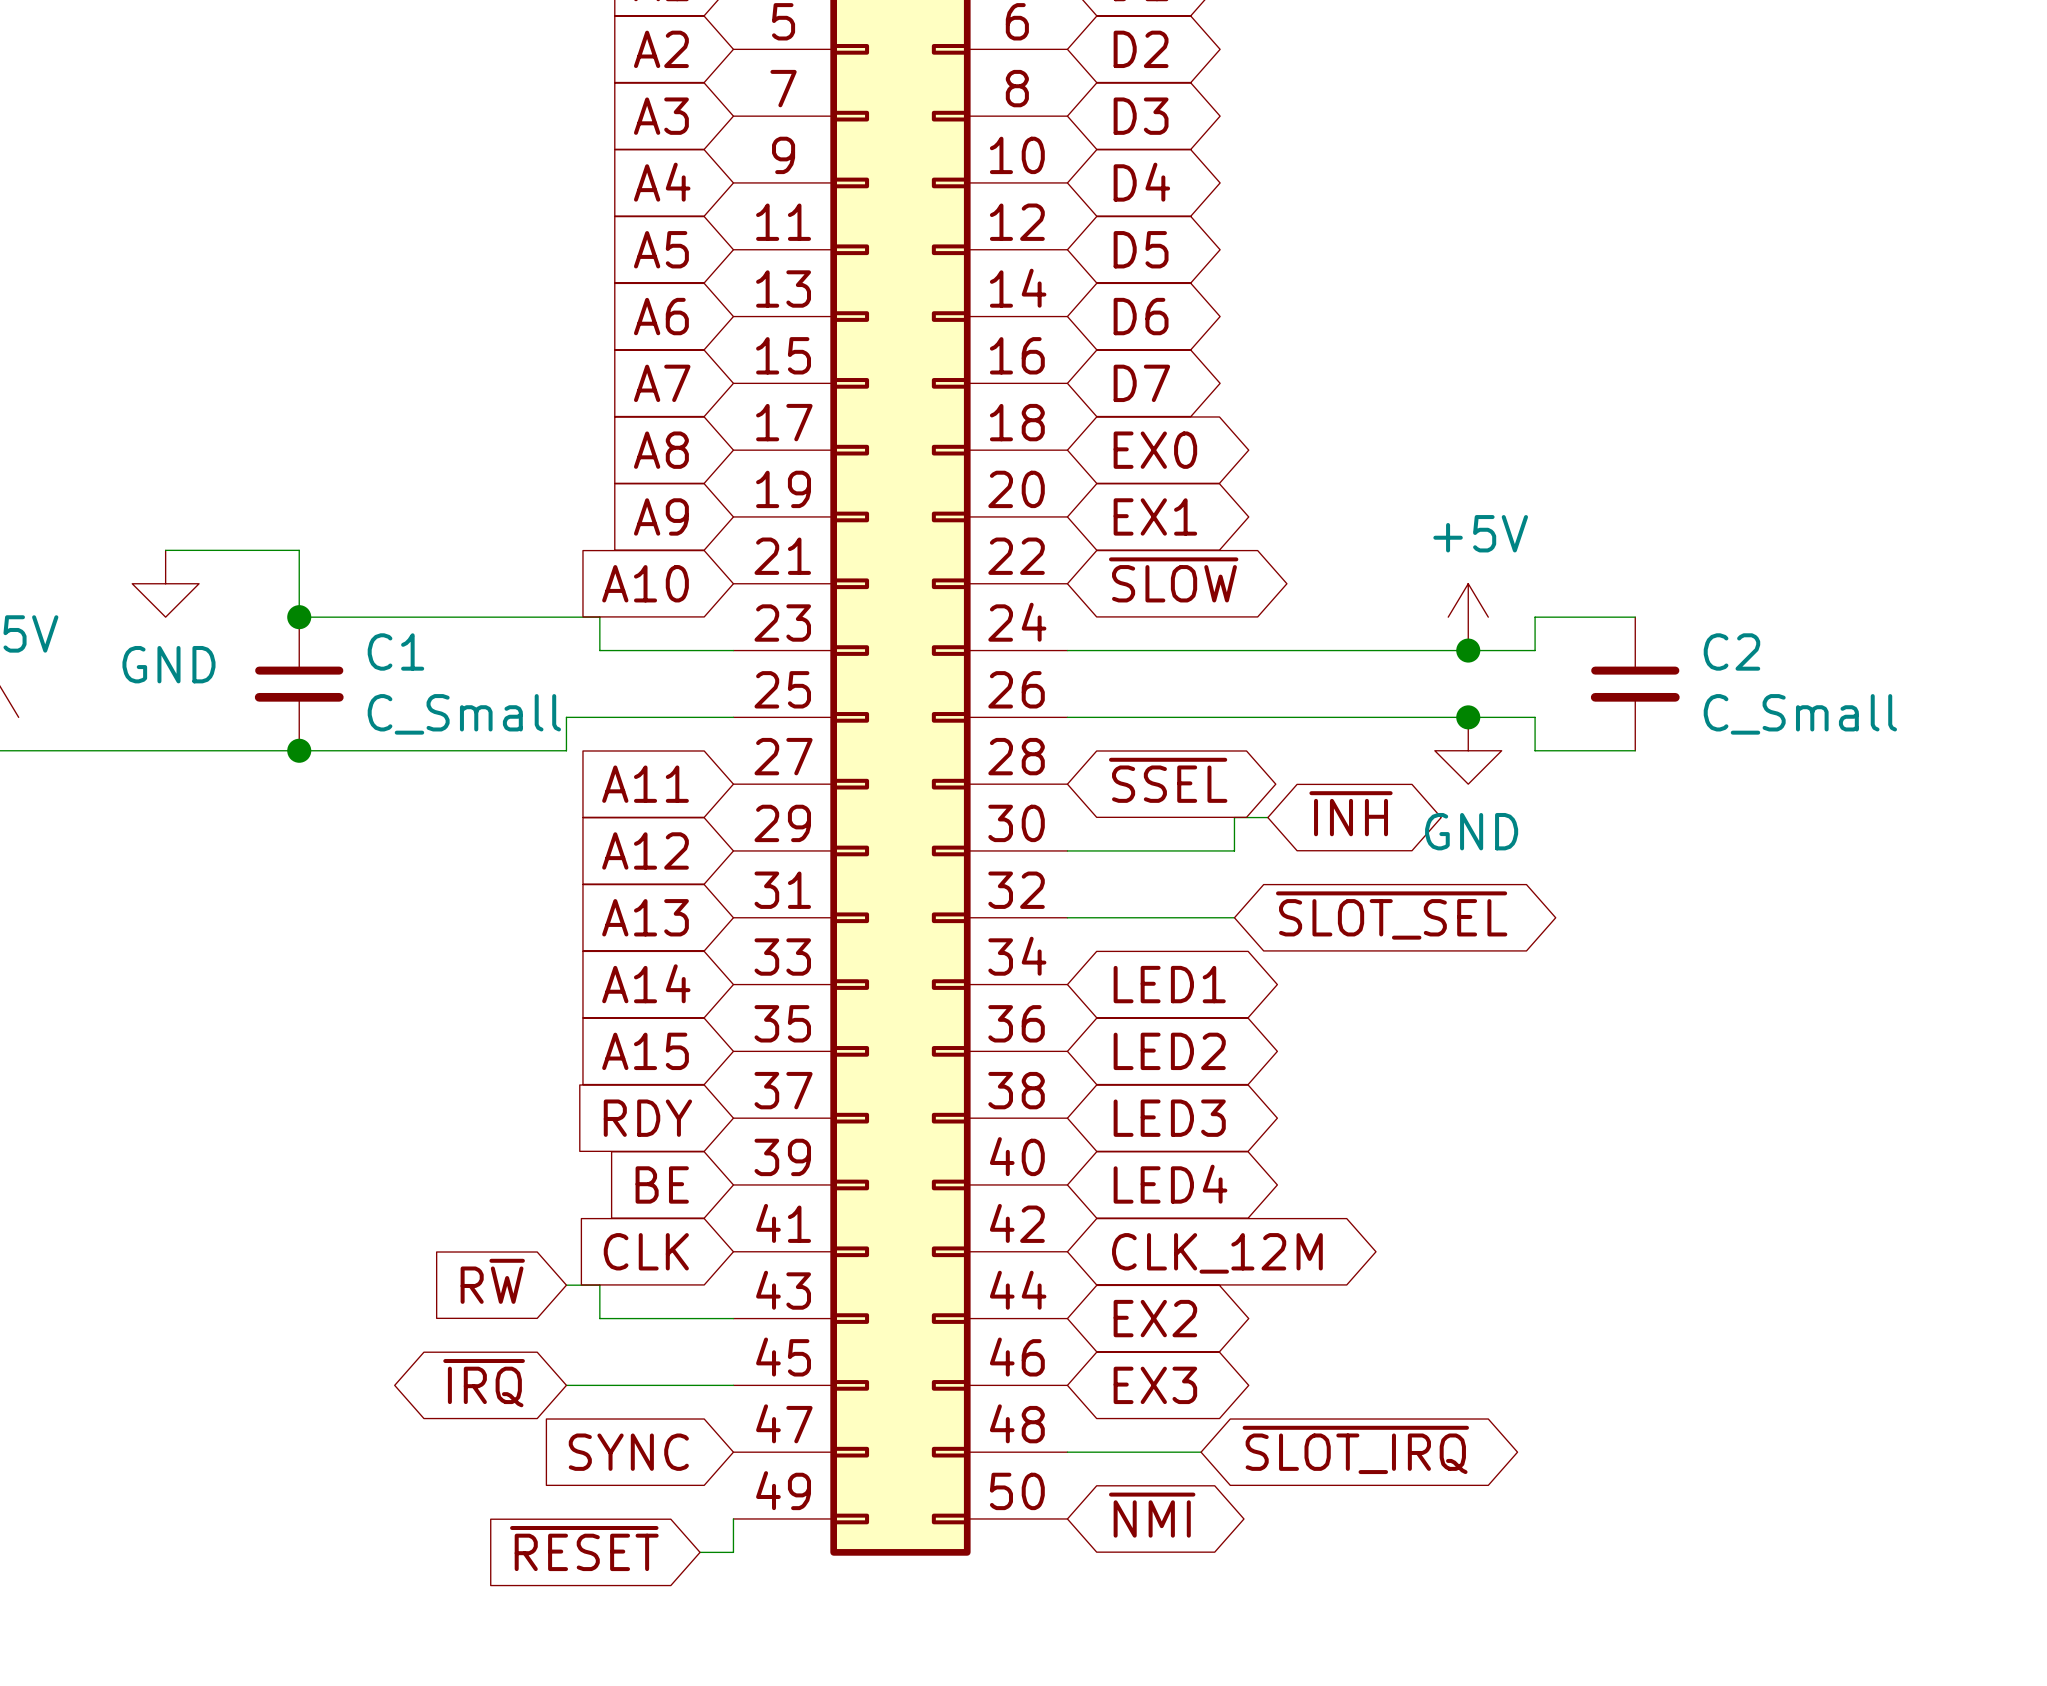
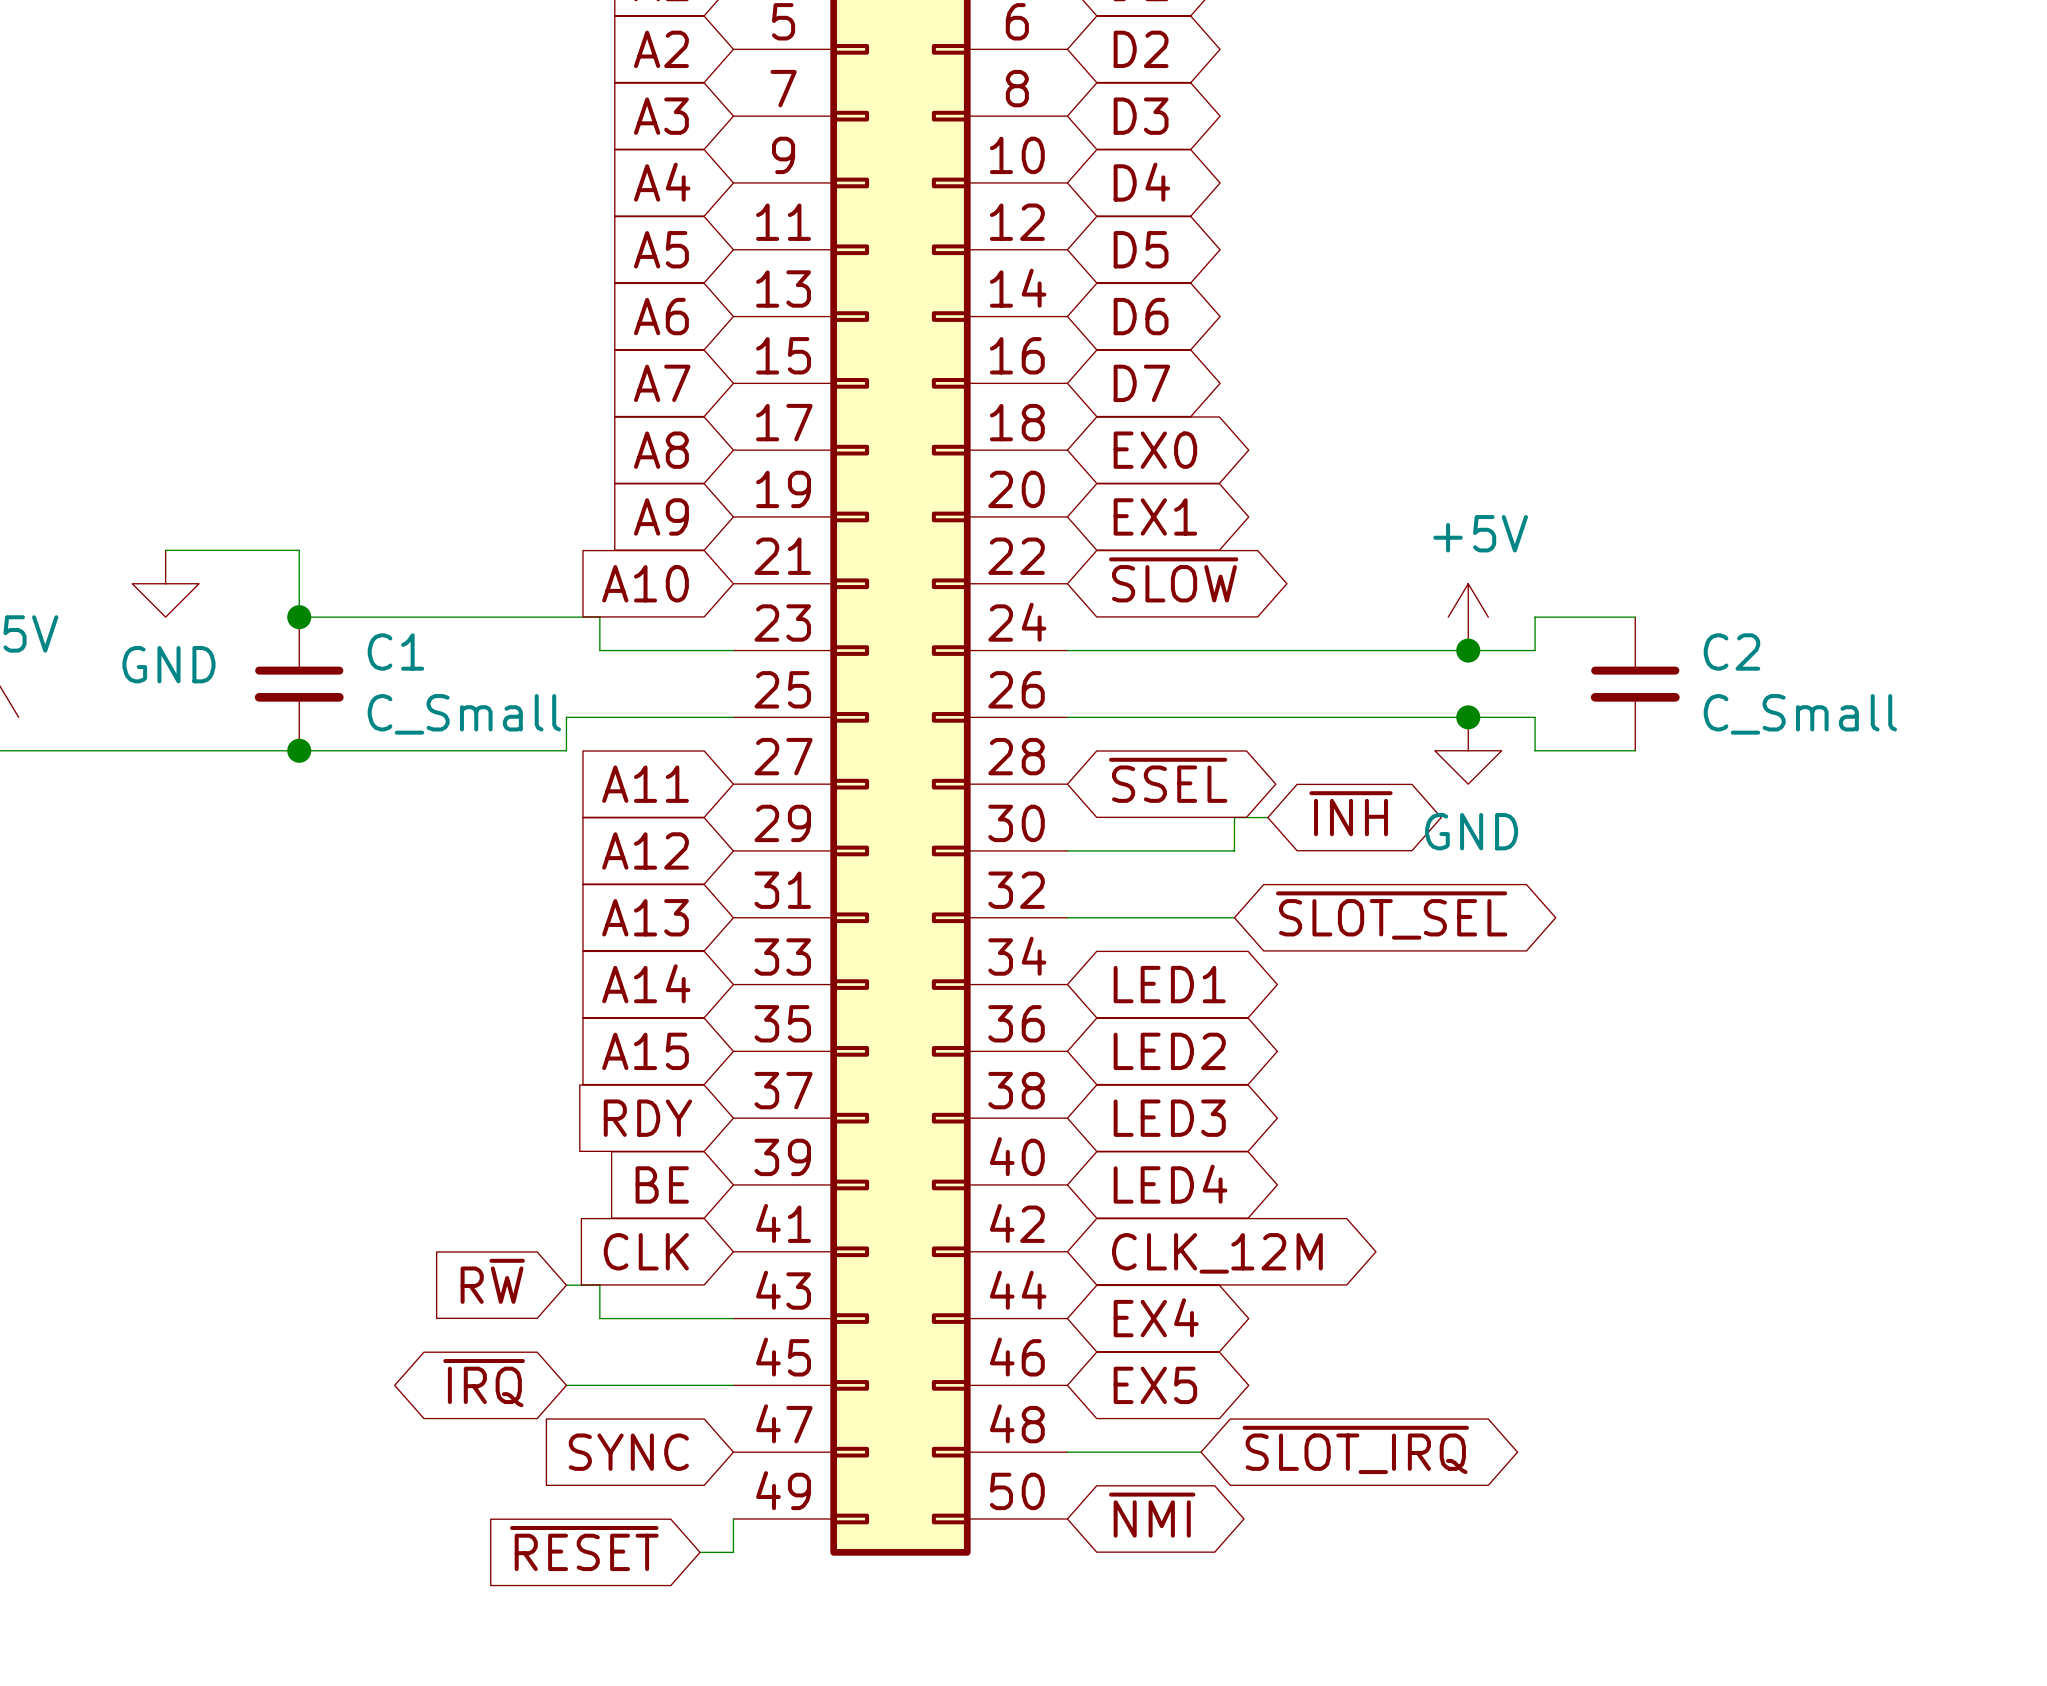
global label: EX2 (1155, 1318) -> EX4 (1156, 1317)
global label: EX3 (1155, 1385) -> EX5 (1155, 1385)

